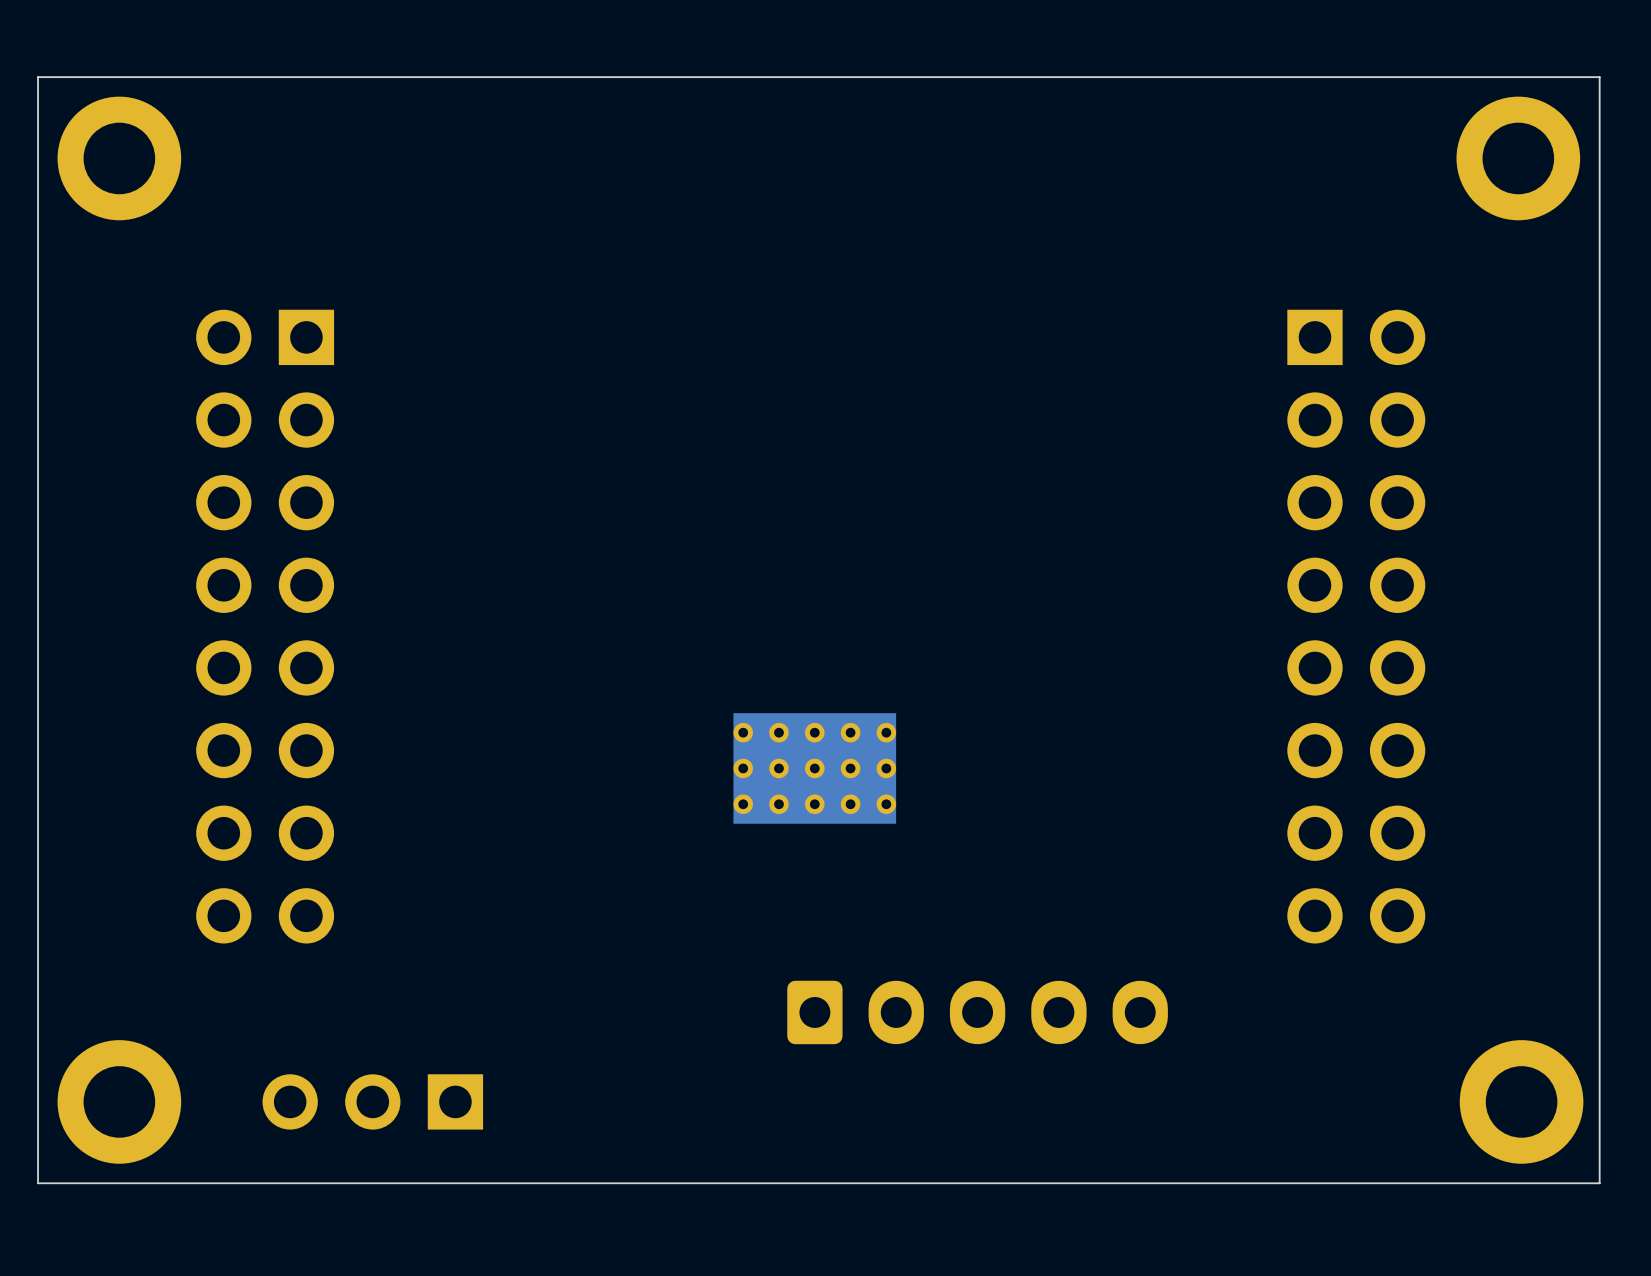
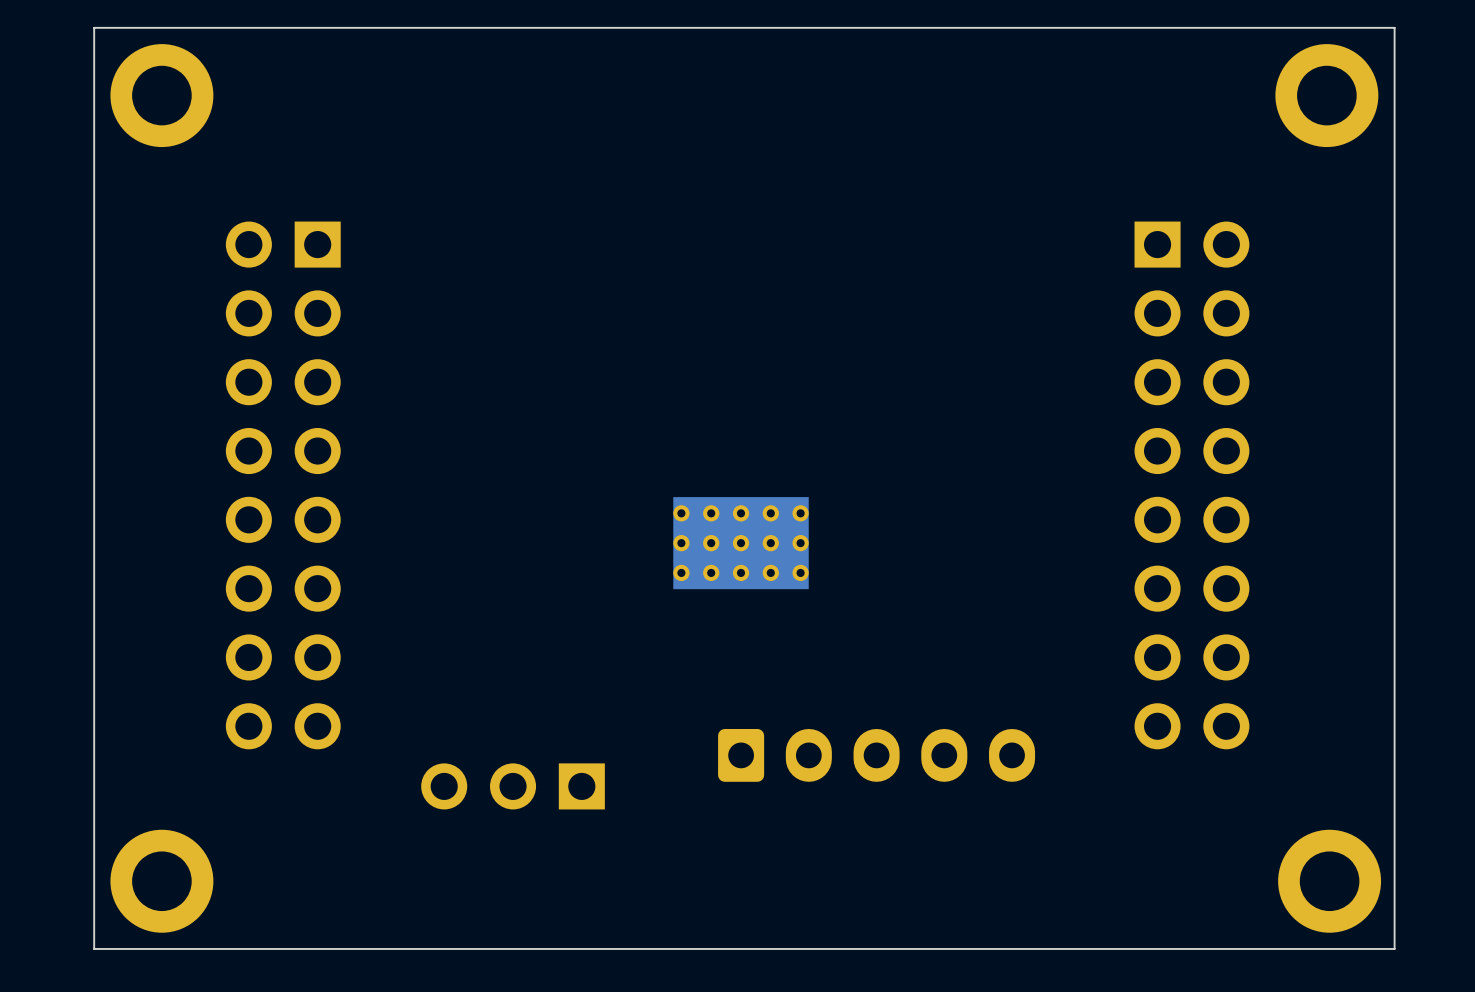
part position: (814, 768) -> (741, 543)
part position: (977, 1012) -> (876, 755)
part position: (372, 1101) -> (513, 786)

